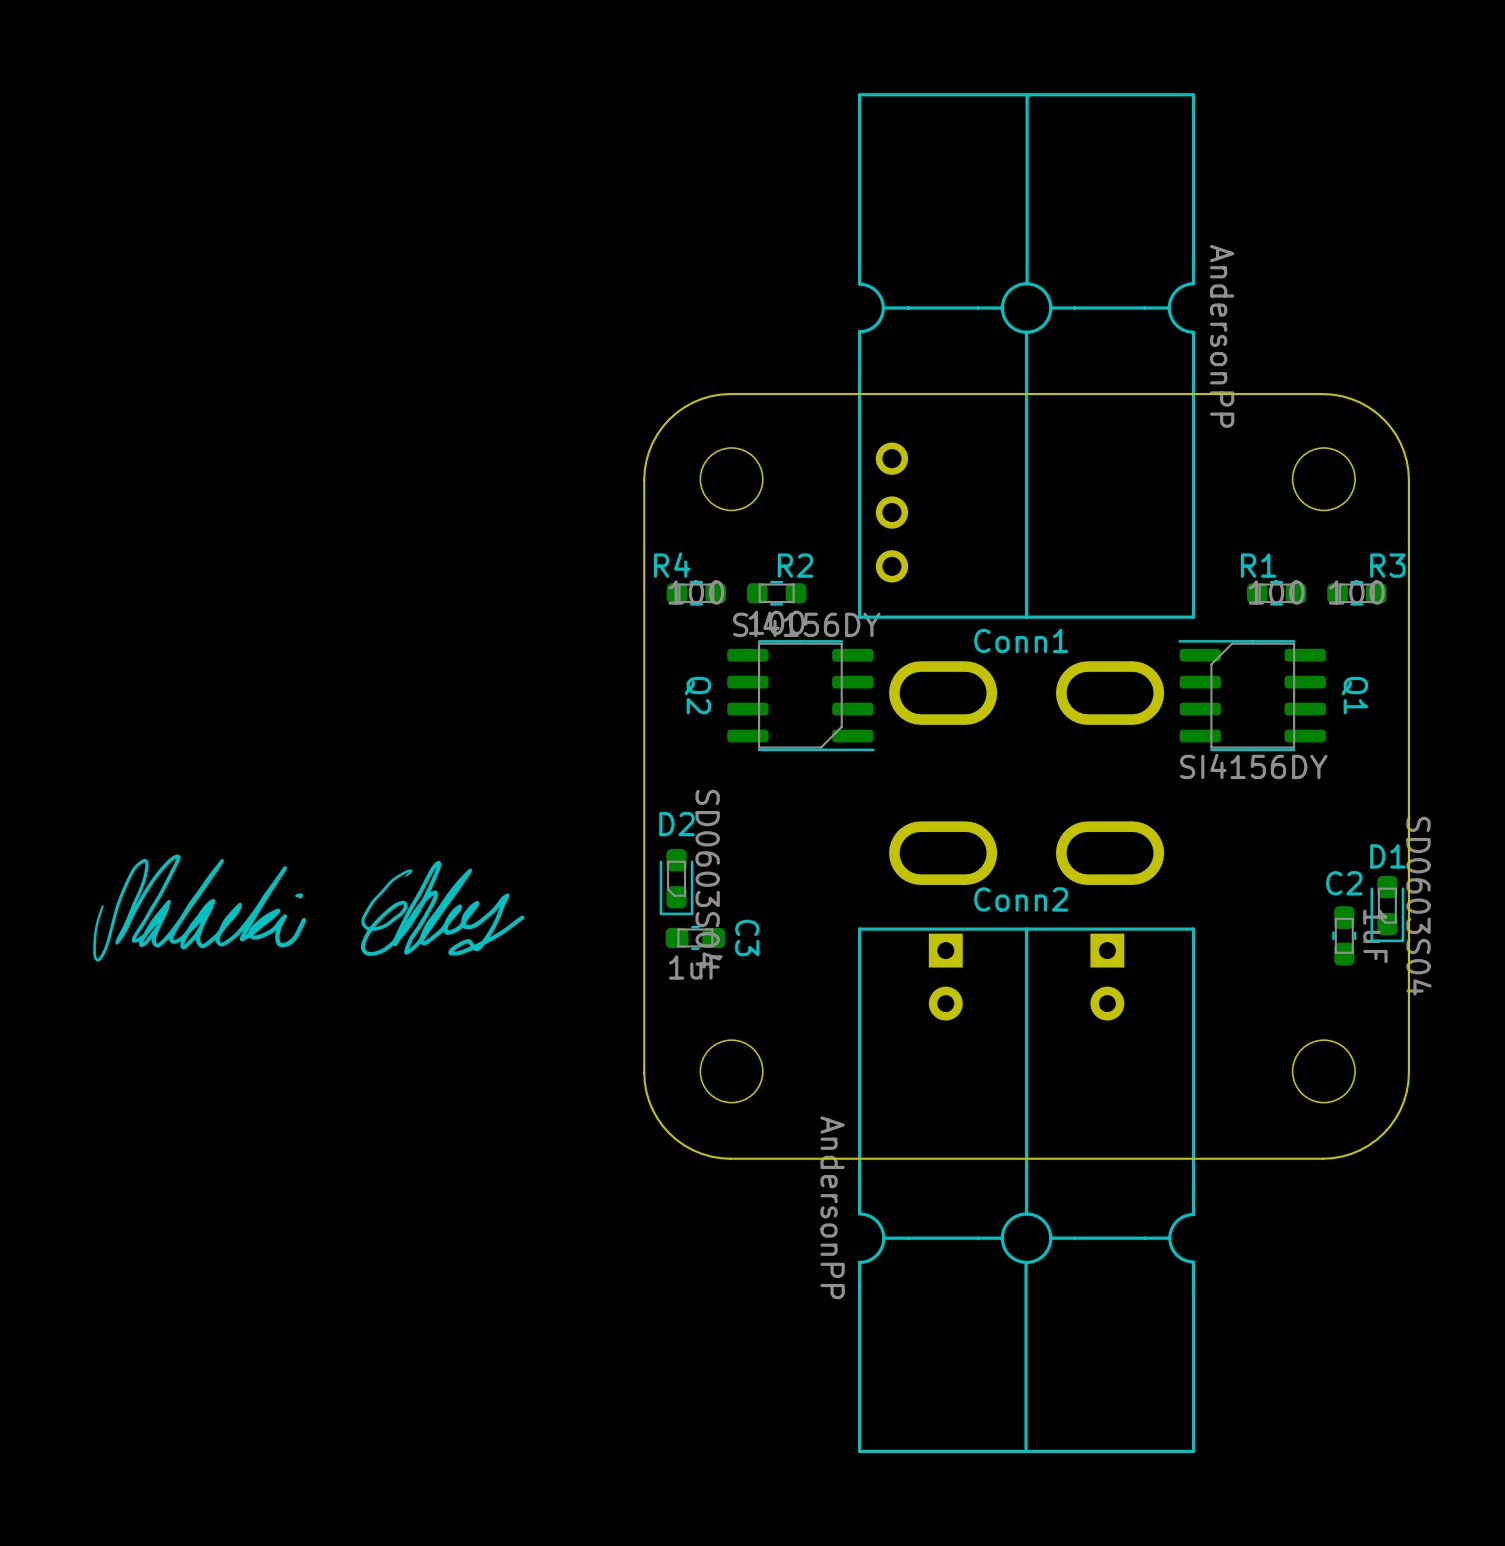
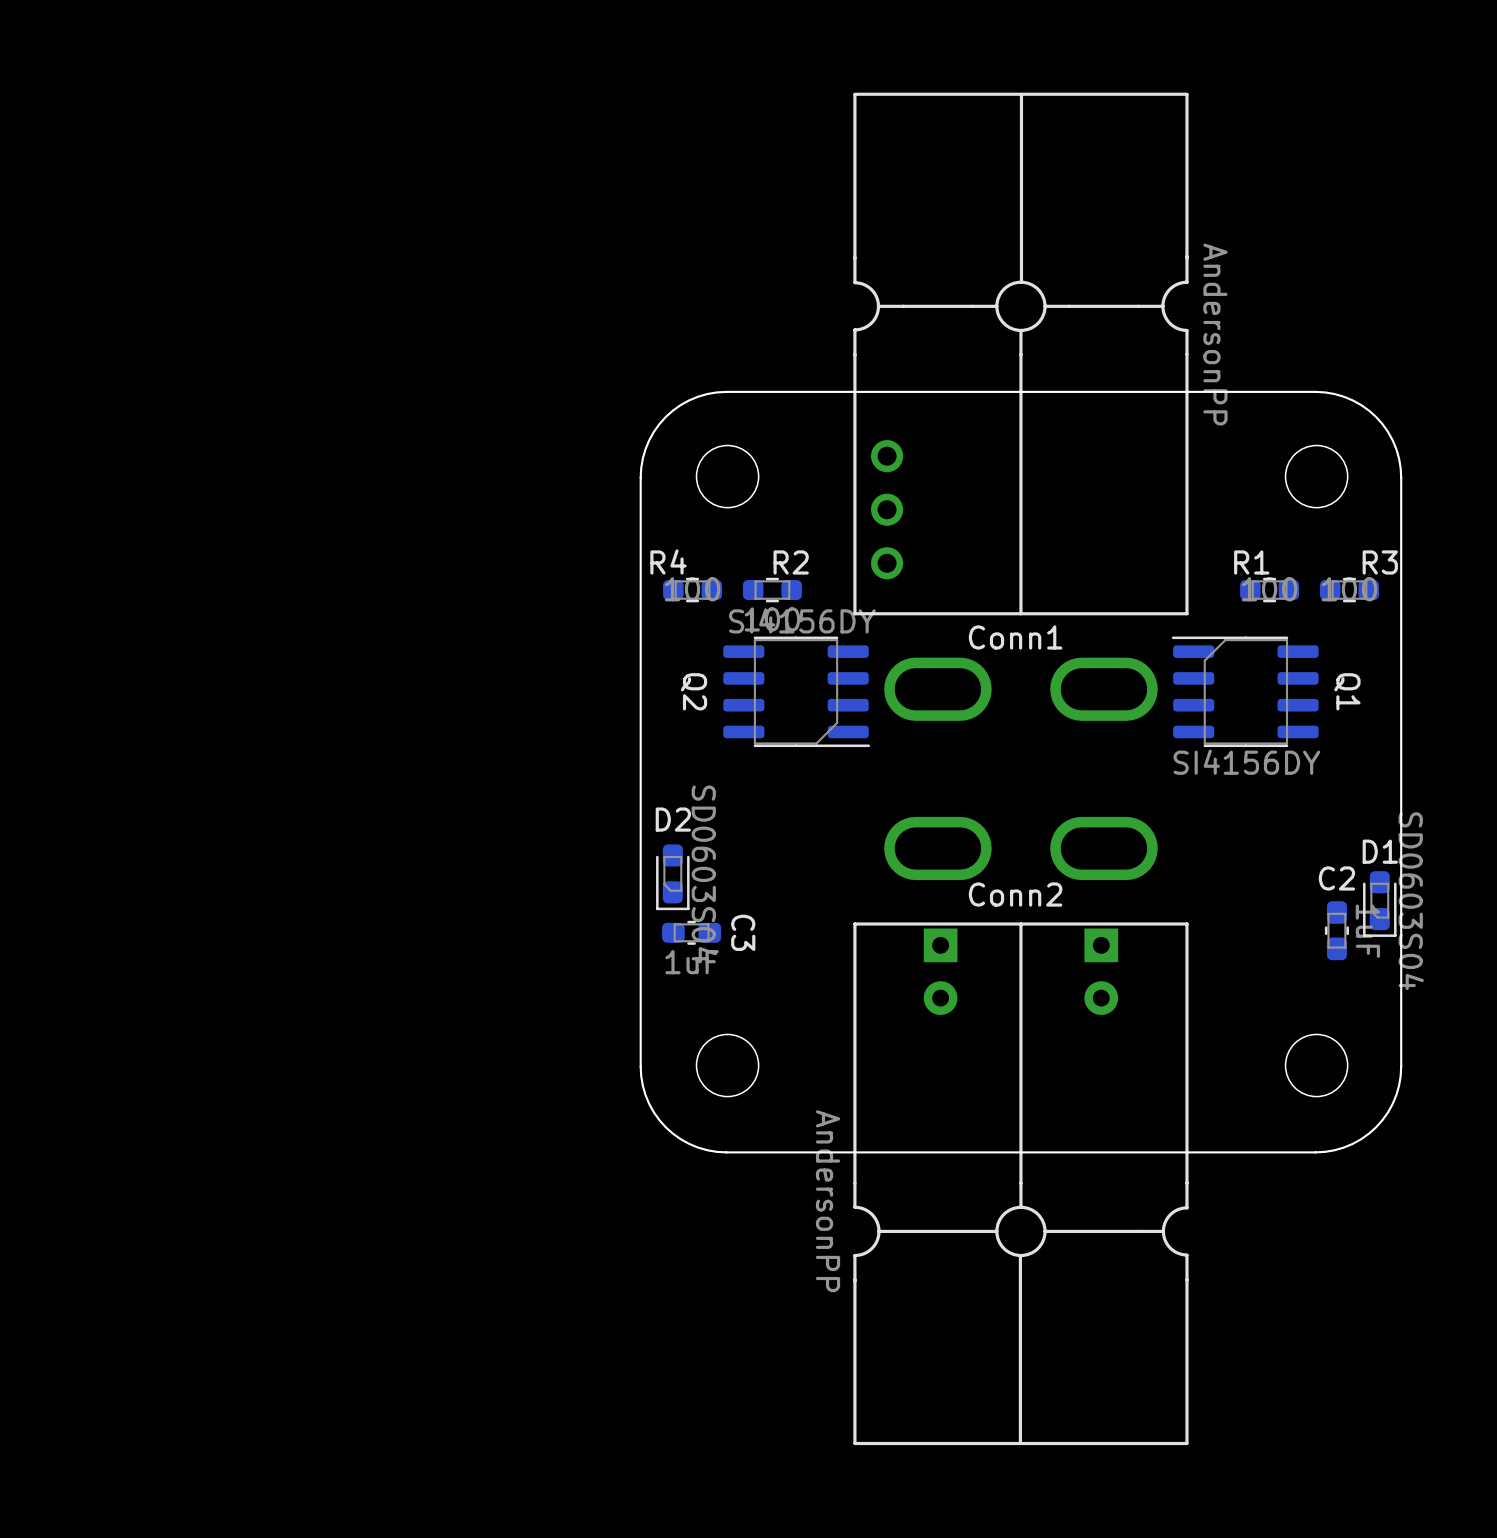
drawing: [93, 854, 525, 962] -> none

